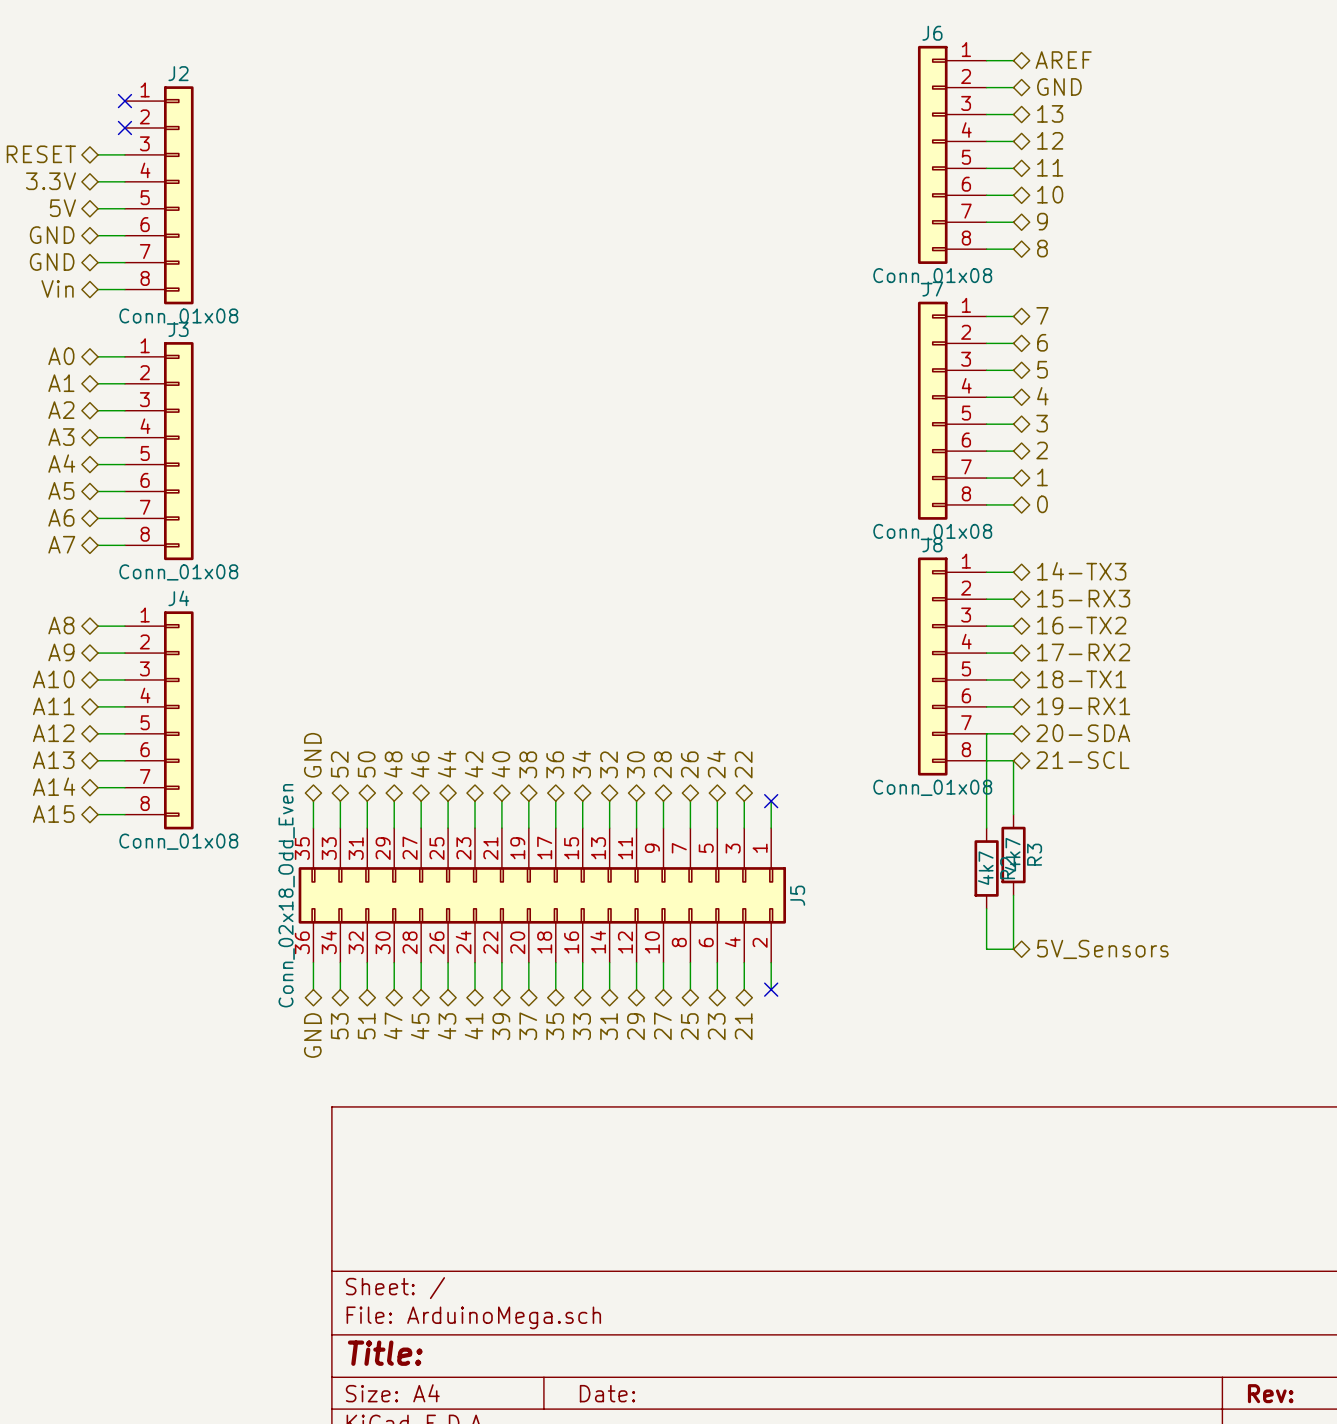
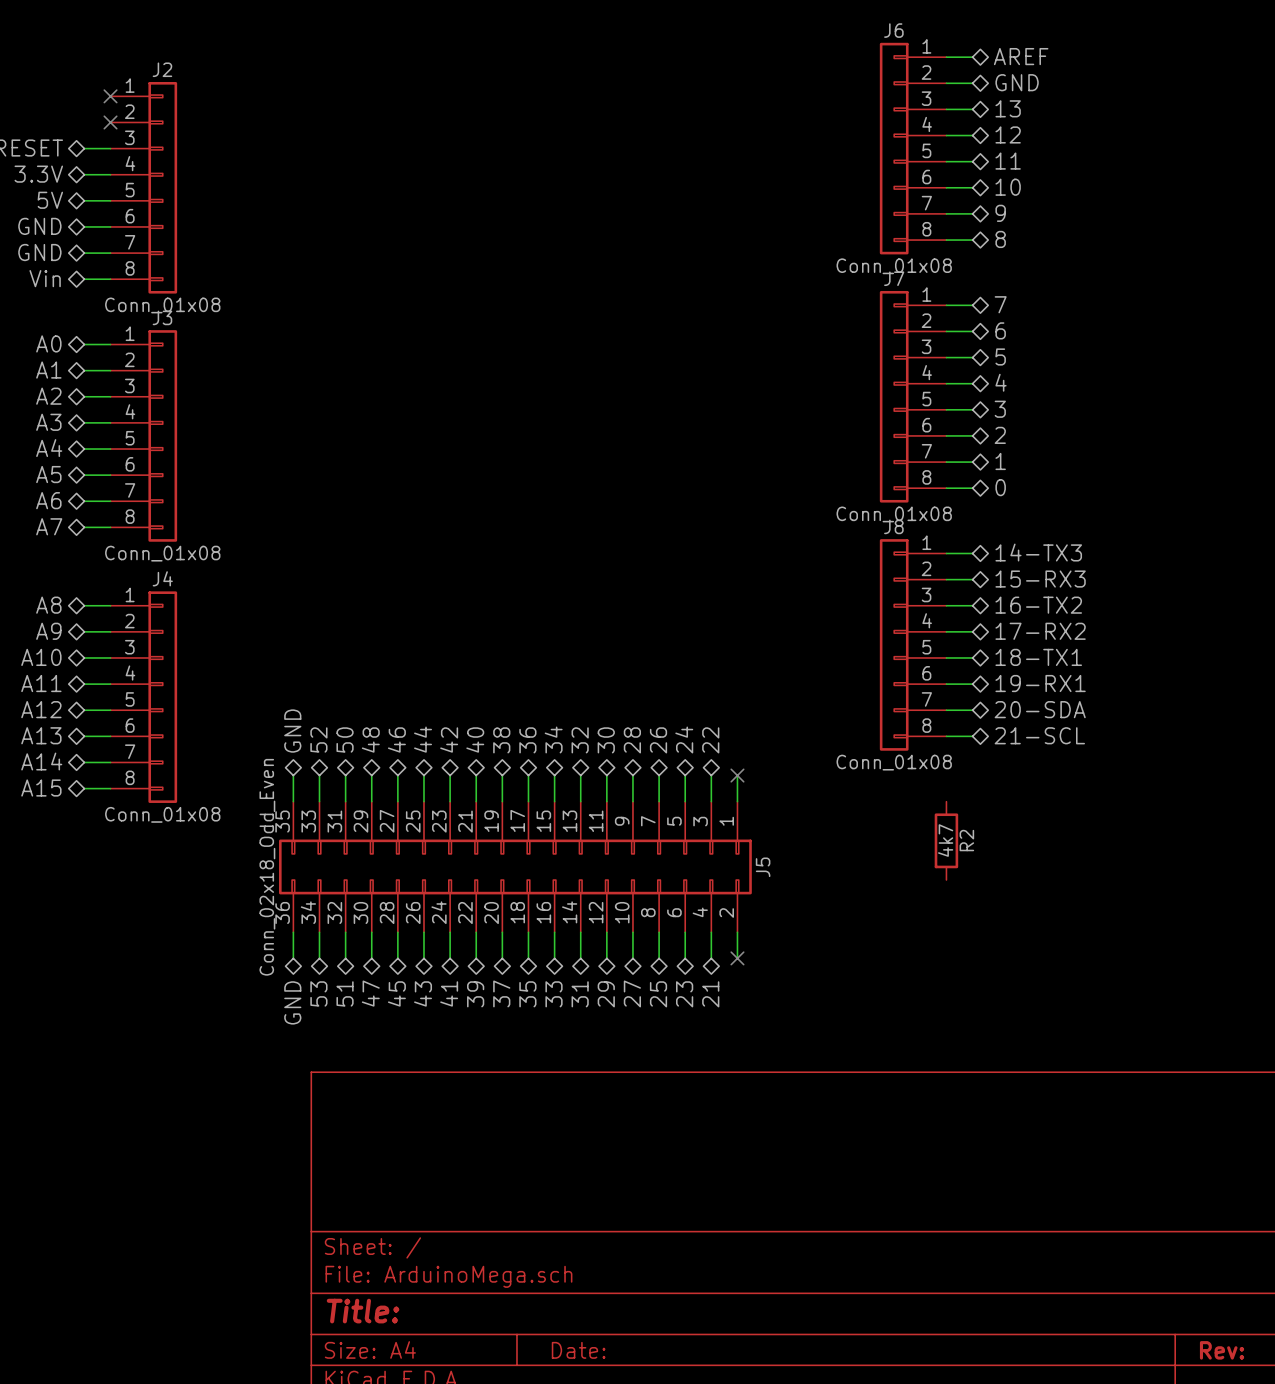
wire: (986, 733) (986, 828) -> none
wire: (1013, 760) (1013, 814) -> none
R3: 4k7 (1013, 855) -> none
wire: (1013, 895) (1013, 949) (986, 949) (986, 908) -> none
hierarchical label: 5V_Sensors (1102, 949) -> none

